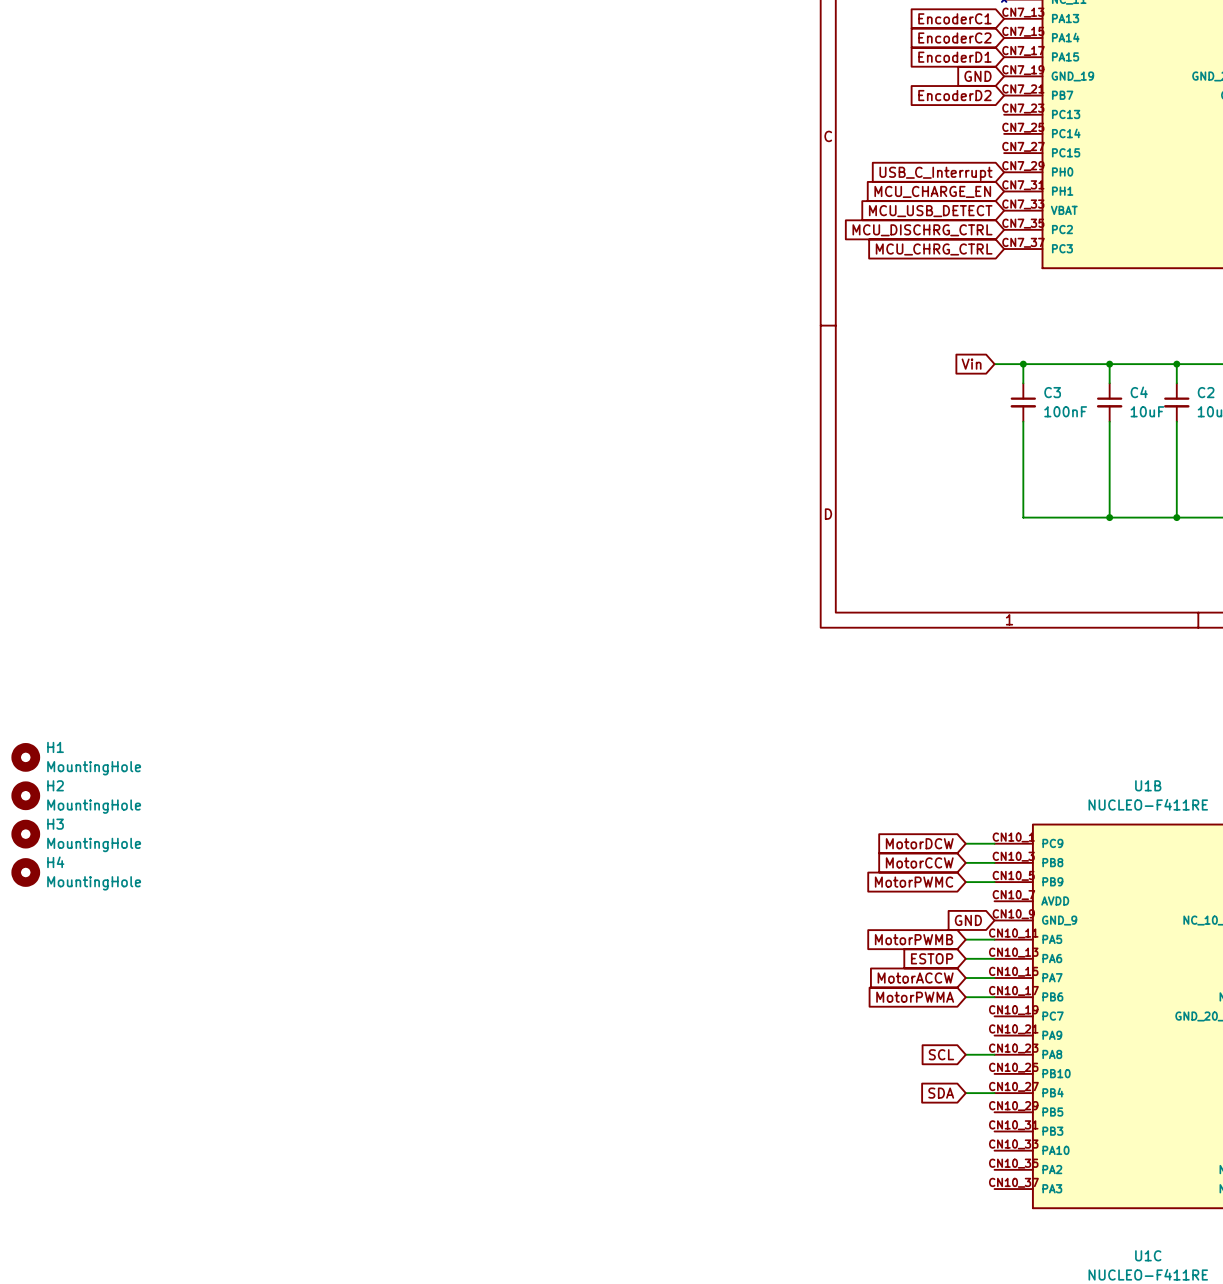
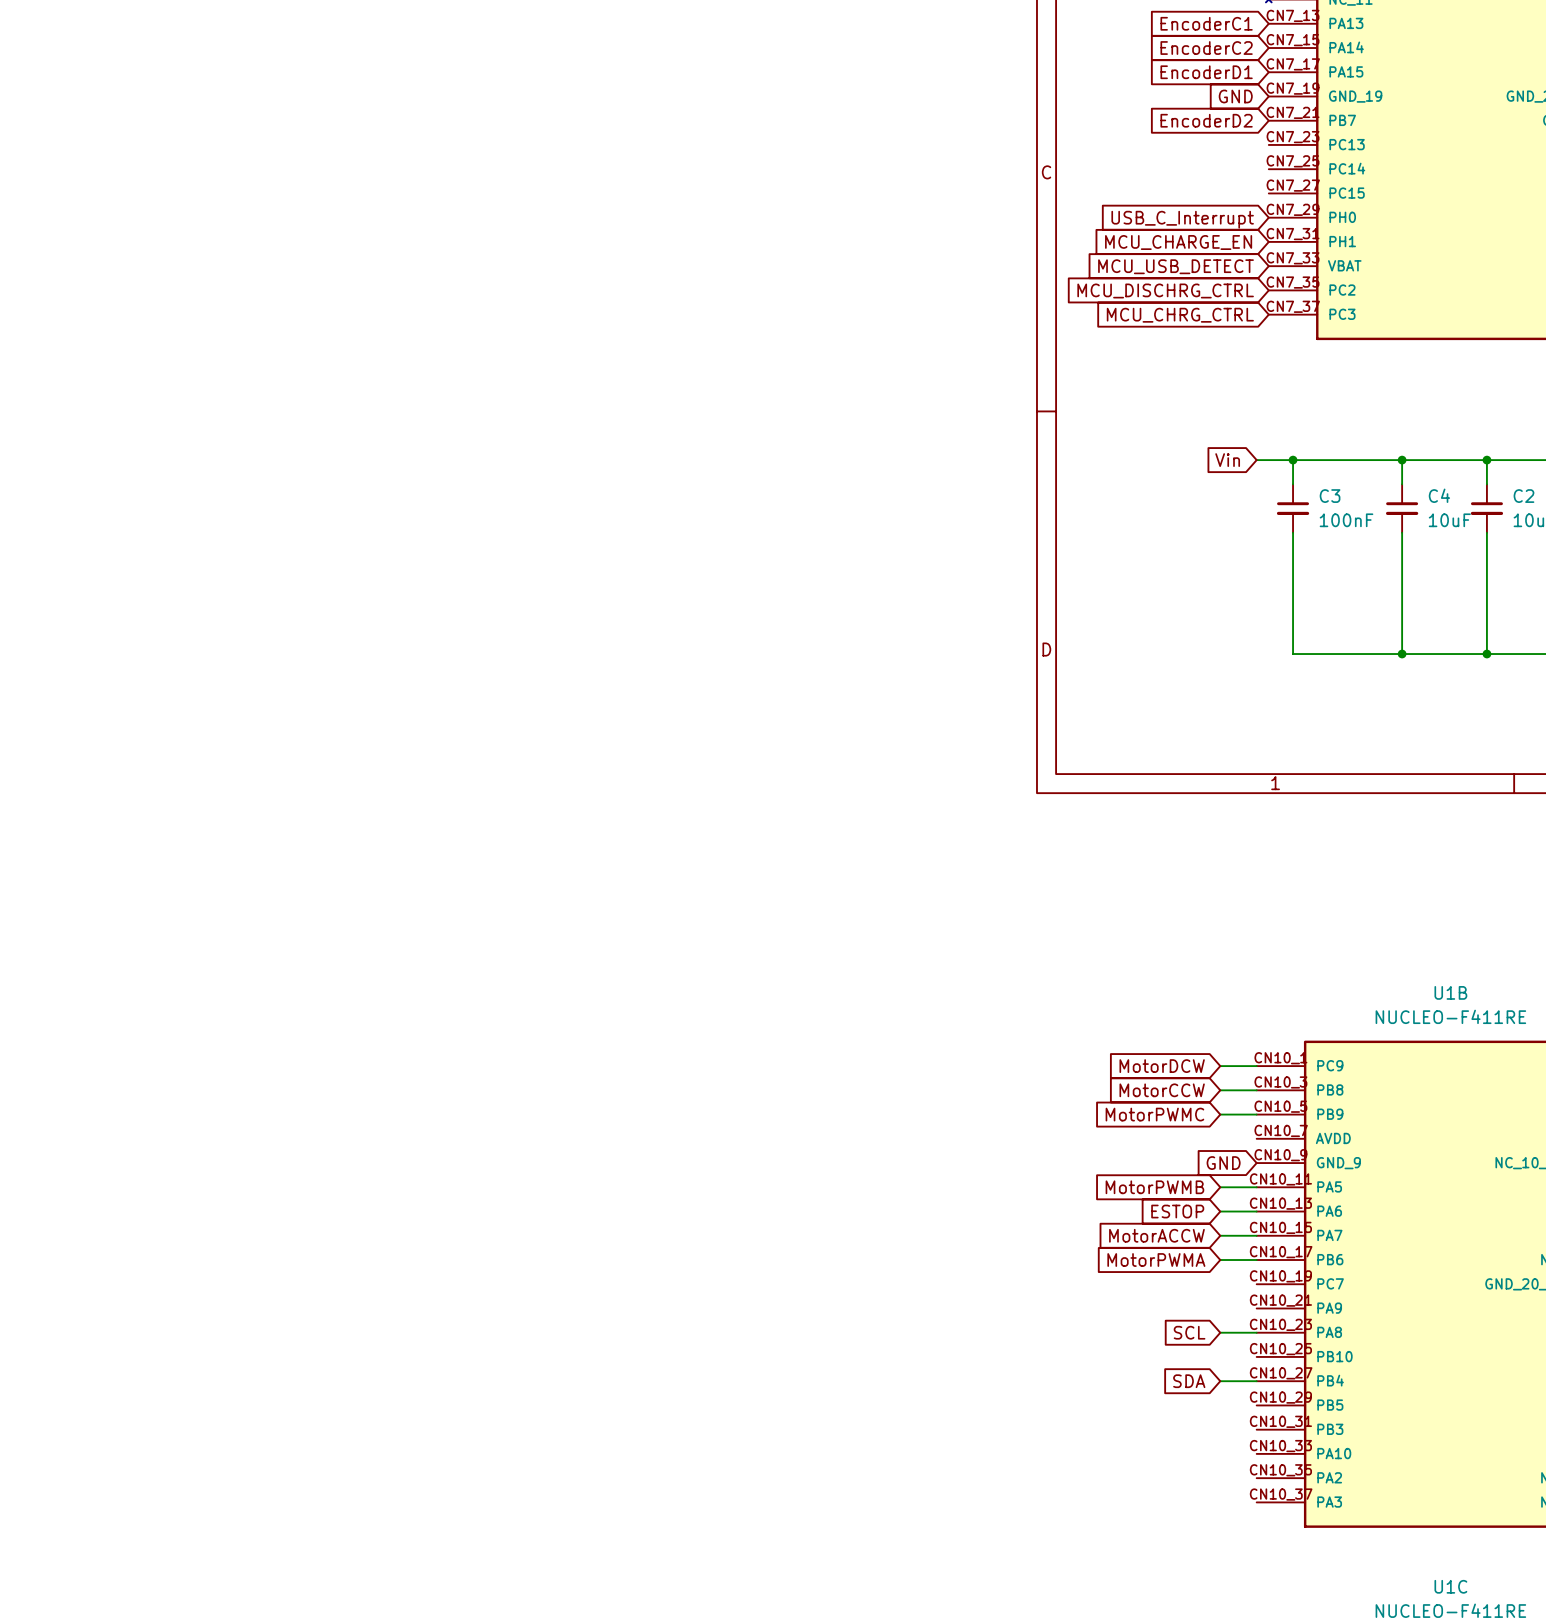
H1: MountingHole (25, 757) -> none
H2: MountingHole (25, 795) -> none
H3: MountingHole (25, 834) -> none
H4: MountingHole (25, 872) -> none

